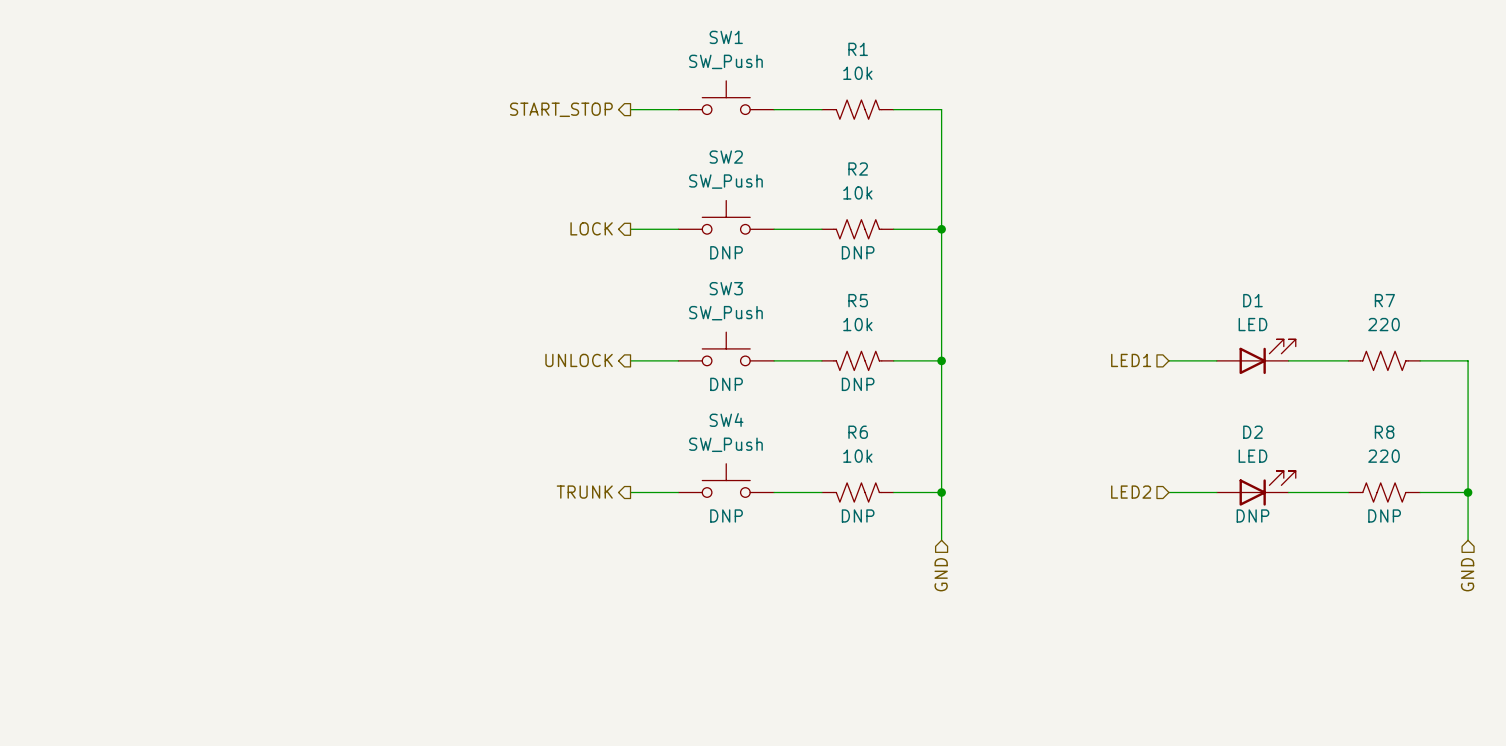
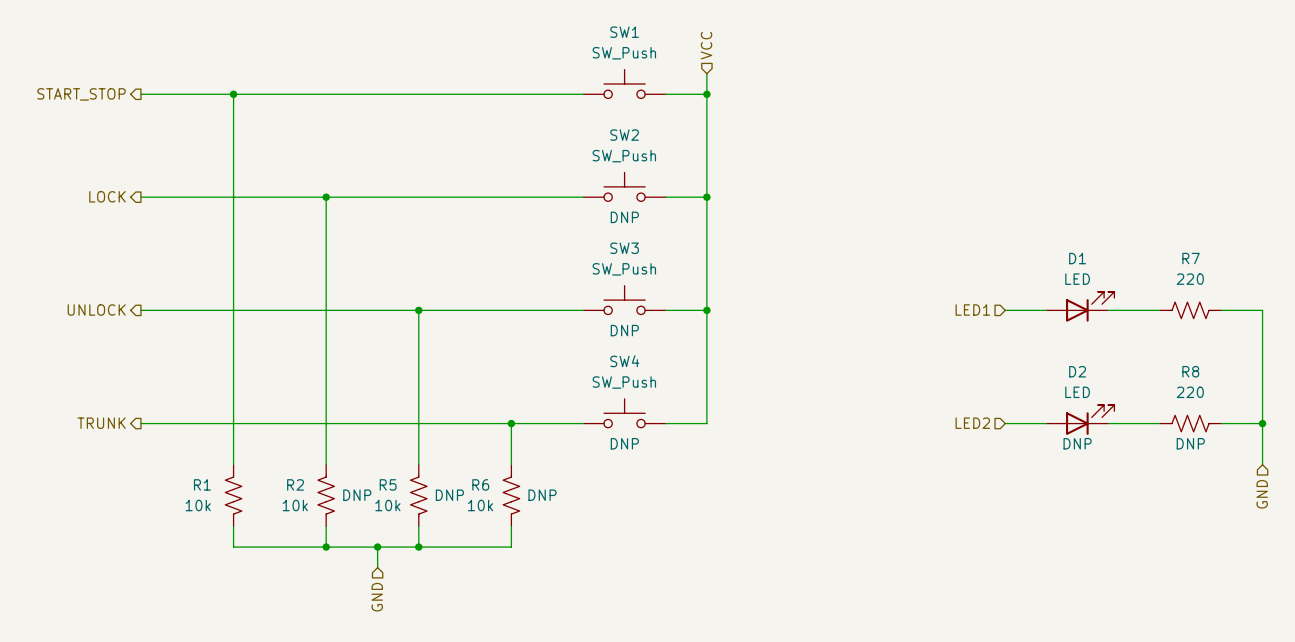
R1 name position: R1 (858, 49) -> R1 (202, 484)
hierarchical label: none -> VCC (706, 45)
R1 value position: 10k (857, 73) -> 10k (198, 505)
wire: none -> (706, 73) (706, 423)
hierarchical label: none -> START_STOP (81, 94)
wire: none -> (140, 94) (542, 94)
wire: none -> (233, 94) (233, 464)
junction: none -> (233, 94)
hierarchical label: START_STOP (561, 109) -> none
junction: none -> (706, 94)
R1 rotation: 0° (857, 109) -> 90° clockwise (233, 495)
R1 position: (857, 109) -> (233, 495)
wire: (893, 109) (941, 109) (941, 540) -> none
R2 name position: R2 (858, 169) -> R2 (295, 484)
R2 value position: 10k (857, 192) -> 10k (295, 505)
hierarchical label: none -> LOCK (107, 196)
hierarchical label: LOCK (591, 228) -> none
wire: none -> (140, 197) (542, 197)
wire: none -> (326, 197) (326, 464)
junction: none -> (326, 197)
junction: none -> (706, 197)
R2 rotation: 0° (857, 229) -> 90° clockwise (326, 495)
R2 position: (857, 229) -> (326, 495)
wire: (893, 229) (941, 229) -> none
junction: (941, 229) -> none
R2 text position: DNP (858, 252) -> DNP (357, 495)
R5 name position: R5 (858, 300) -> R5 (388, 484)
R5 value position: 10k (857, 324) -> 10k (387, 505)
hierarchical label: none -> UNLOCK (96, 309)
wire: none -> (140, 310) (542, 310)
wire: none -> (418, 310) (418, 464)
junction: none -> (418, 310)
hierarchical label: UNLOCK (579, 360) -> none
junction: none -> (706, 310)
R5 rotation: 0° (857, 360) -> 90° clockwise (418, 495)
R5 position: (857, 360) -> (418, 495)
wire: (893, 360) (941, 360) -> none
junction: (941, 360) -> none
R5 text position: DNP (858, 384) -> DNP (449, 495)
R6 name position: R6 (858, 432) -> R6 (480, 484)
R6 value position: 10k (857, 456) -> 10k (480, 505)
hierarchical label: none -> TRUNK (101, 423)
wire: none -> (140, 423) (542, 423)
hierarchical label: TRUNK (584, 492) -> none
wire: none -> (511, 423) (511, 464)
junction: none -> (511, 423)
R6 rotation: 0° (857, 492) -> 90° clockwise (511, 495)
R6 position: (857, 492) -> (511, 495)
wire: (893, 492) (941, 492) -> none
junction: (941, 492) -> none
R6 text position: DNP (858, 515) -> DNP (542, 495)
hierarchical label: GND (941, 574) -> none
wire: none -> (233, 526) (233, 547) (511, 547) (511, 526)
wire: none -> (326, 526) (326, 547)
wire: none -> (418, 526) (418, 547)
junction: none -> (326, 547)
wire: none -> (377, 547) (377, 567)
junction: none -> (377, 547)
junction: none -> (418, 547)
hierarchical label: none -> GND (377, 597)

